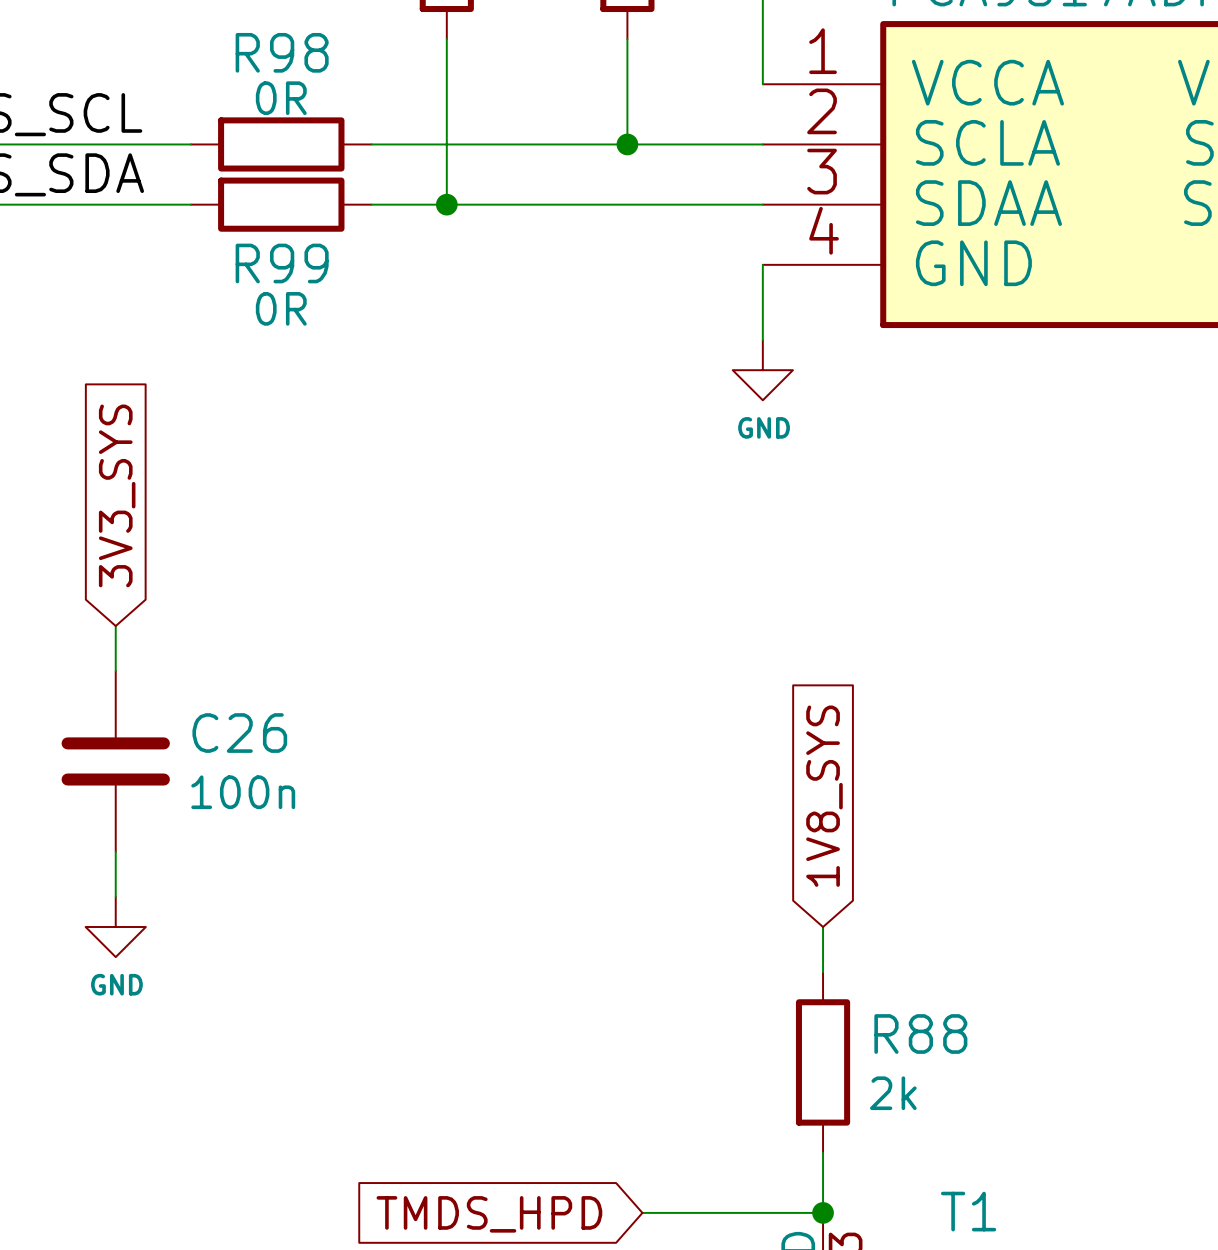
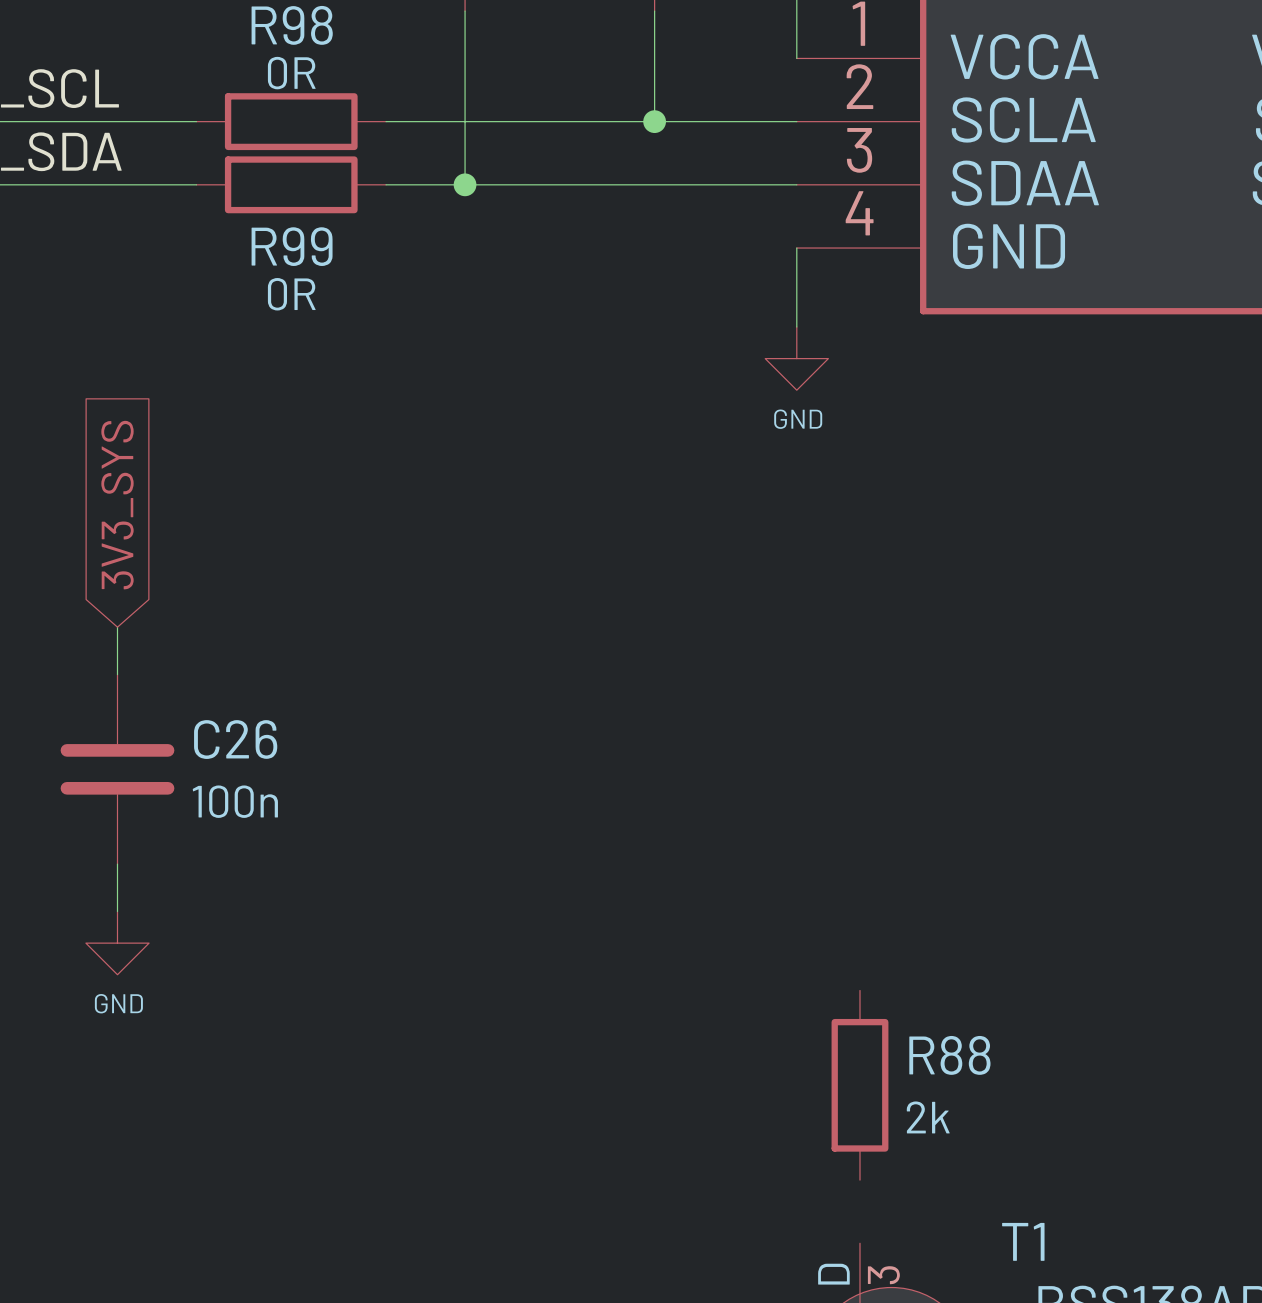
global label: 1V8_SYS (824, 796) -> none
wire: (823, 927) (823, 972) -> none
wire: (823, 1152) (823, 1212) (642, 1212) -> none
junction: (823, 1212) -> none
global label: TMDS_HPD (489, 1214) -> none

